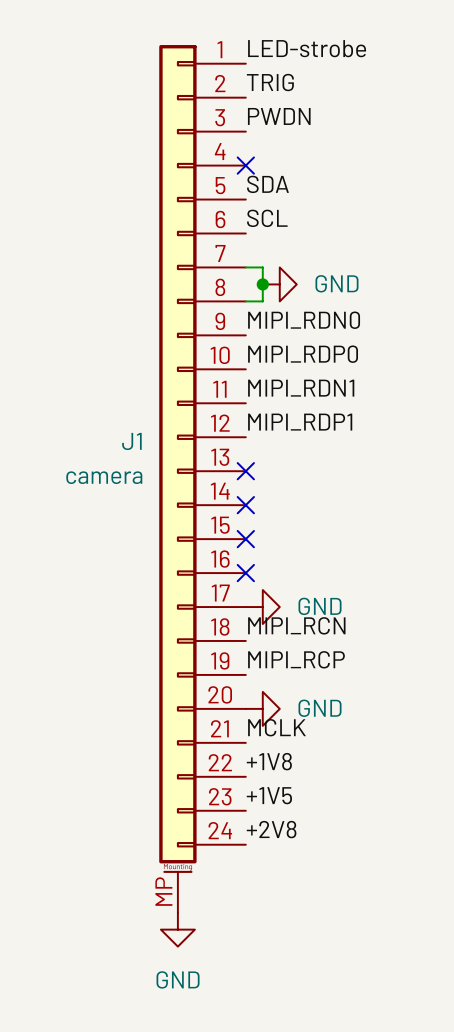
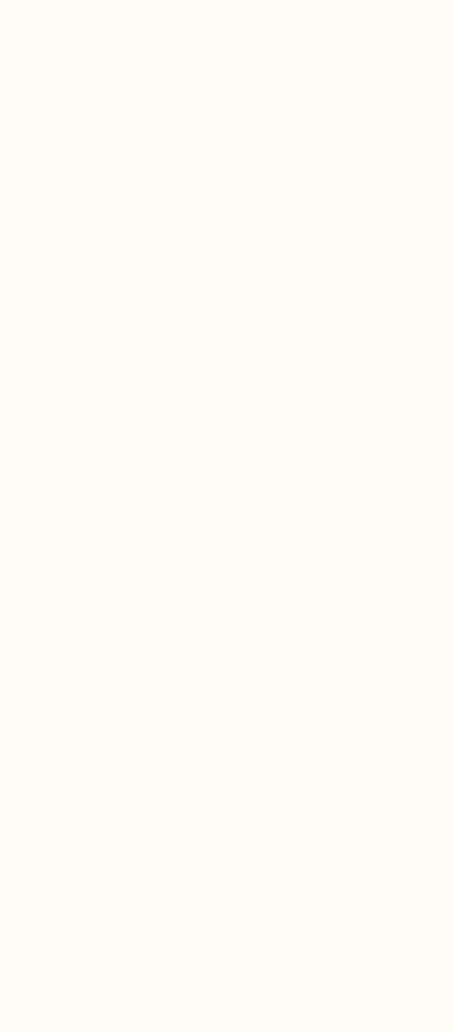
label: LED-strobe (307, 48) -> none
label: TRIG (270, 82) -> none
label: PWDN (279, 116) -> none
no-connect mark: (245, 165) -> none
label: SDA (267, 184) -> none
label: SCL (267, 218) -> none
wire: (245, 267) (262, 267) (262, 301) (245, 301) -> none
junction: (262, 284) -> none
power symbol: GND (279, 284) -> none
label: MIPI_RDN0 (304, 320) -> none
label: MIPI_RDP0 (303, 354) -> none
label: MIPI_RDN1 (301, 388) -> none
label: MIPI_RDP1 (300, 422) -> none
no-connect mark: (245, 471) -> none
J1: camera (202, 478) -> none
no-connect mark: (245, 505) -> none
no-connect mark: (245, 539) -> none
no-connect mark: (245, 573) -> none
power symbol: GND (262, 607) -> none
label: MIPI_RCN (296, 625) -> none
label: MIPI_RCP (296, 659) -> none
power symbol: GND (262, 708) -> none
label: MCLK (276, 727) -> none
label: +1V8 (269, 761) -> none
label: +1V5 (269, 795) -> none
label: +2V8 (271, 829) -> none
power symbol: GND (177, 929) -> none

